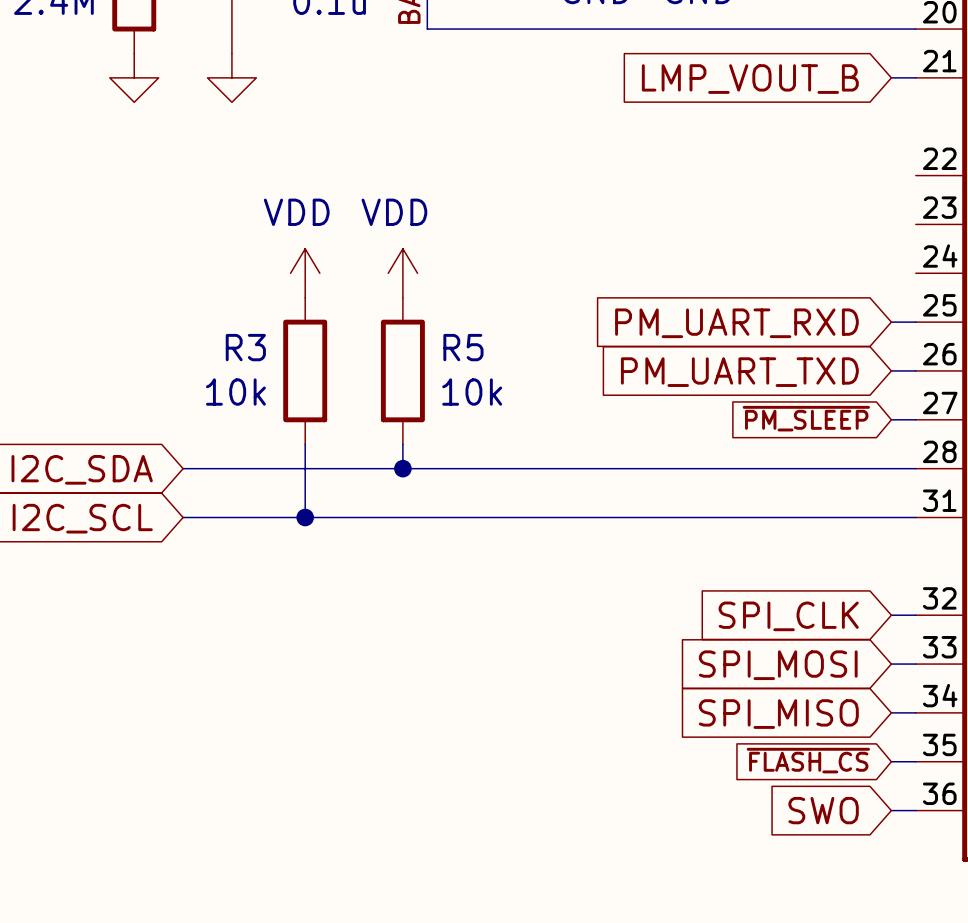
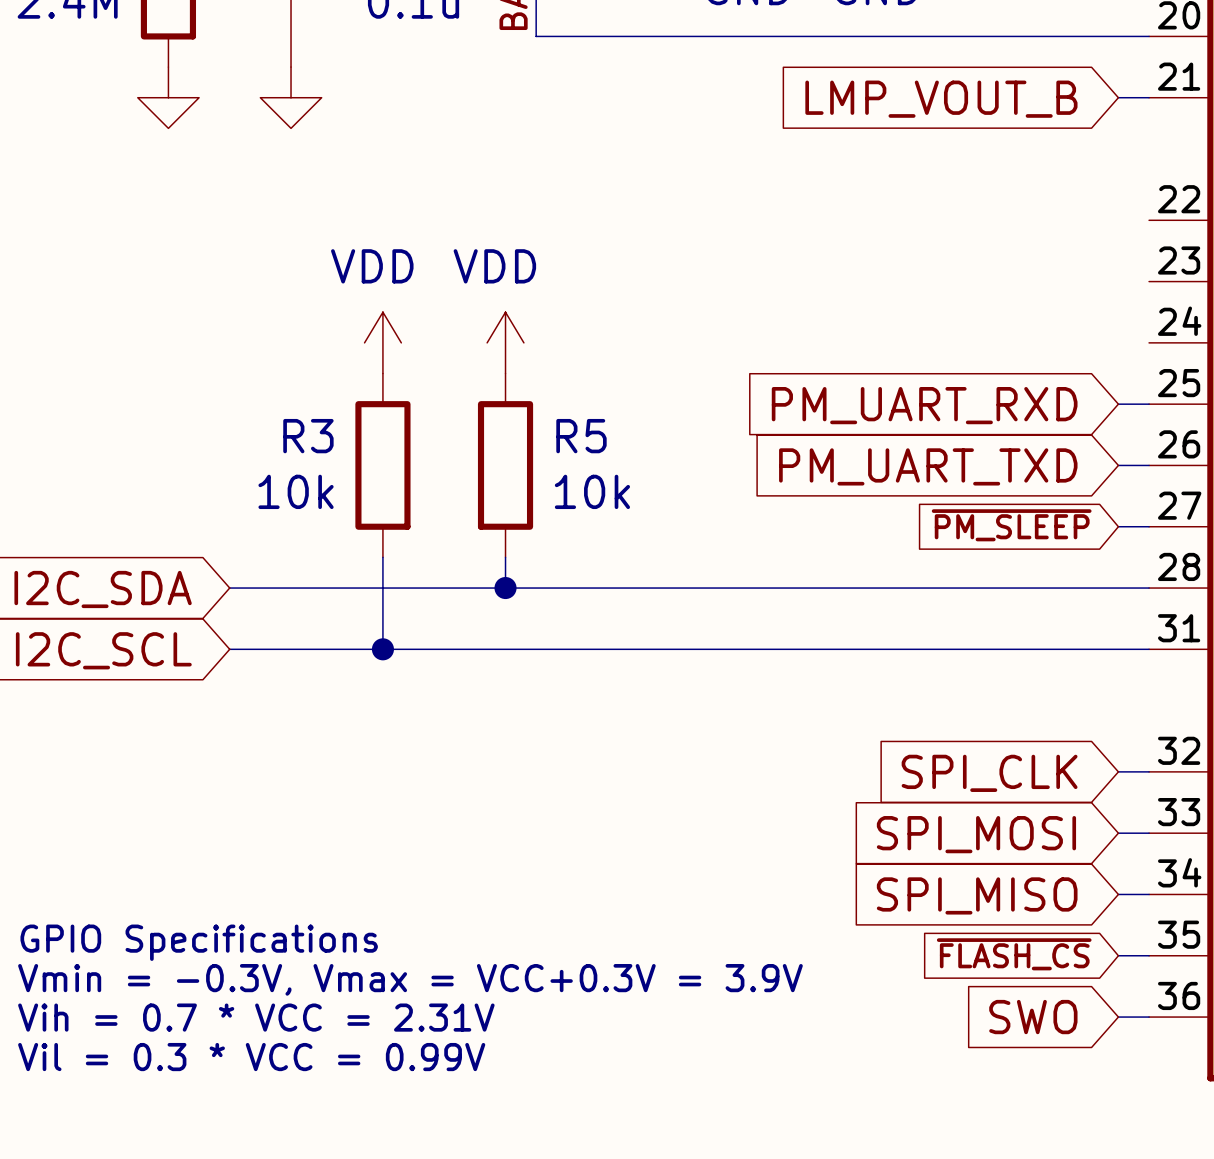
text: none -> GPIO Specifications (199, 942)
text: none -> Vmin = -0.3V, Vmax = VCC+0.3V = 3.9V (410, 979)
text: none -> Vih = 0.7 * VCC = 2.31V (256, 1017)
text: none -> Vil = 0.3 * VCC = 0.99V (251, 1057)

